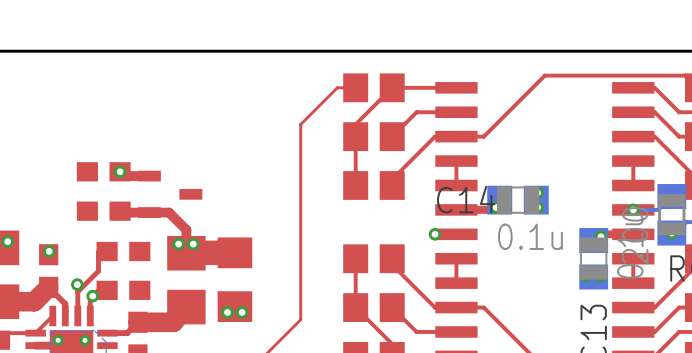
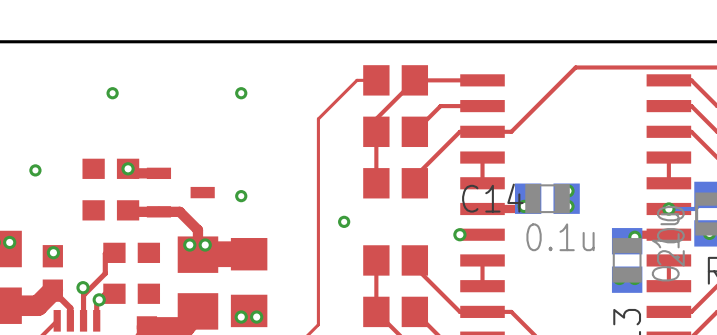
via: none -> (112, 93)
via: none -> (241, 93)
via: none -> (35, 170)
via: none -> (241, 196)
via: none -> (344, 221)

